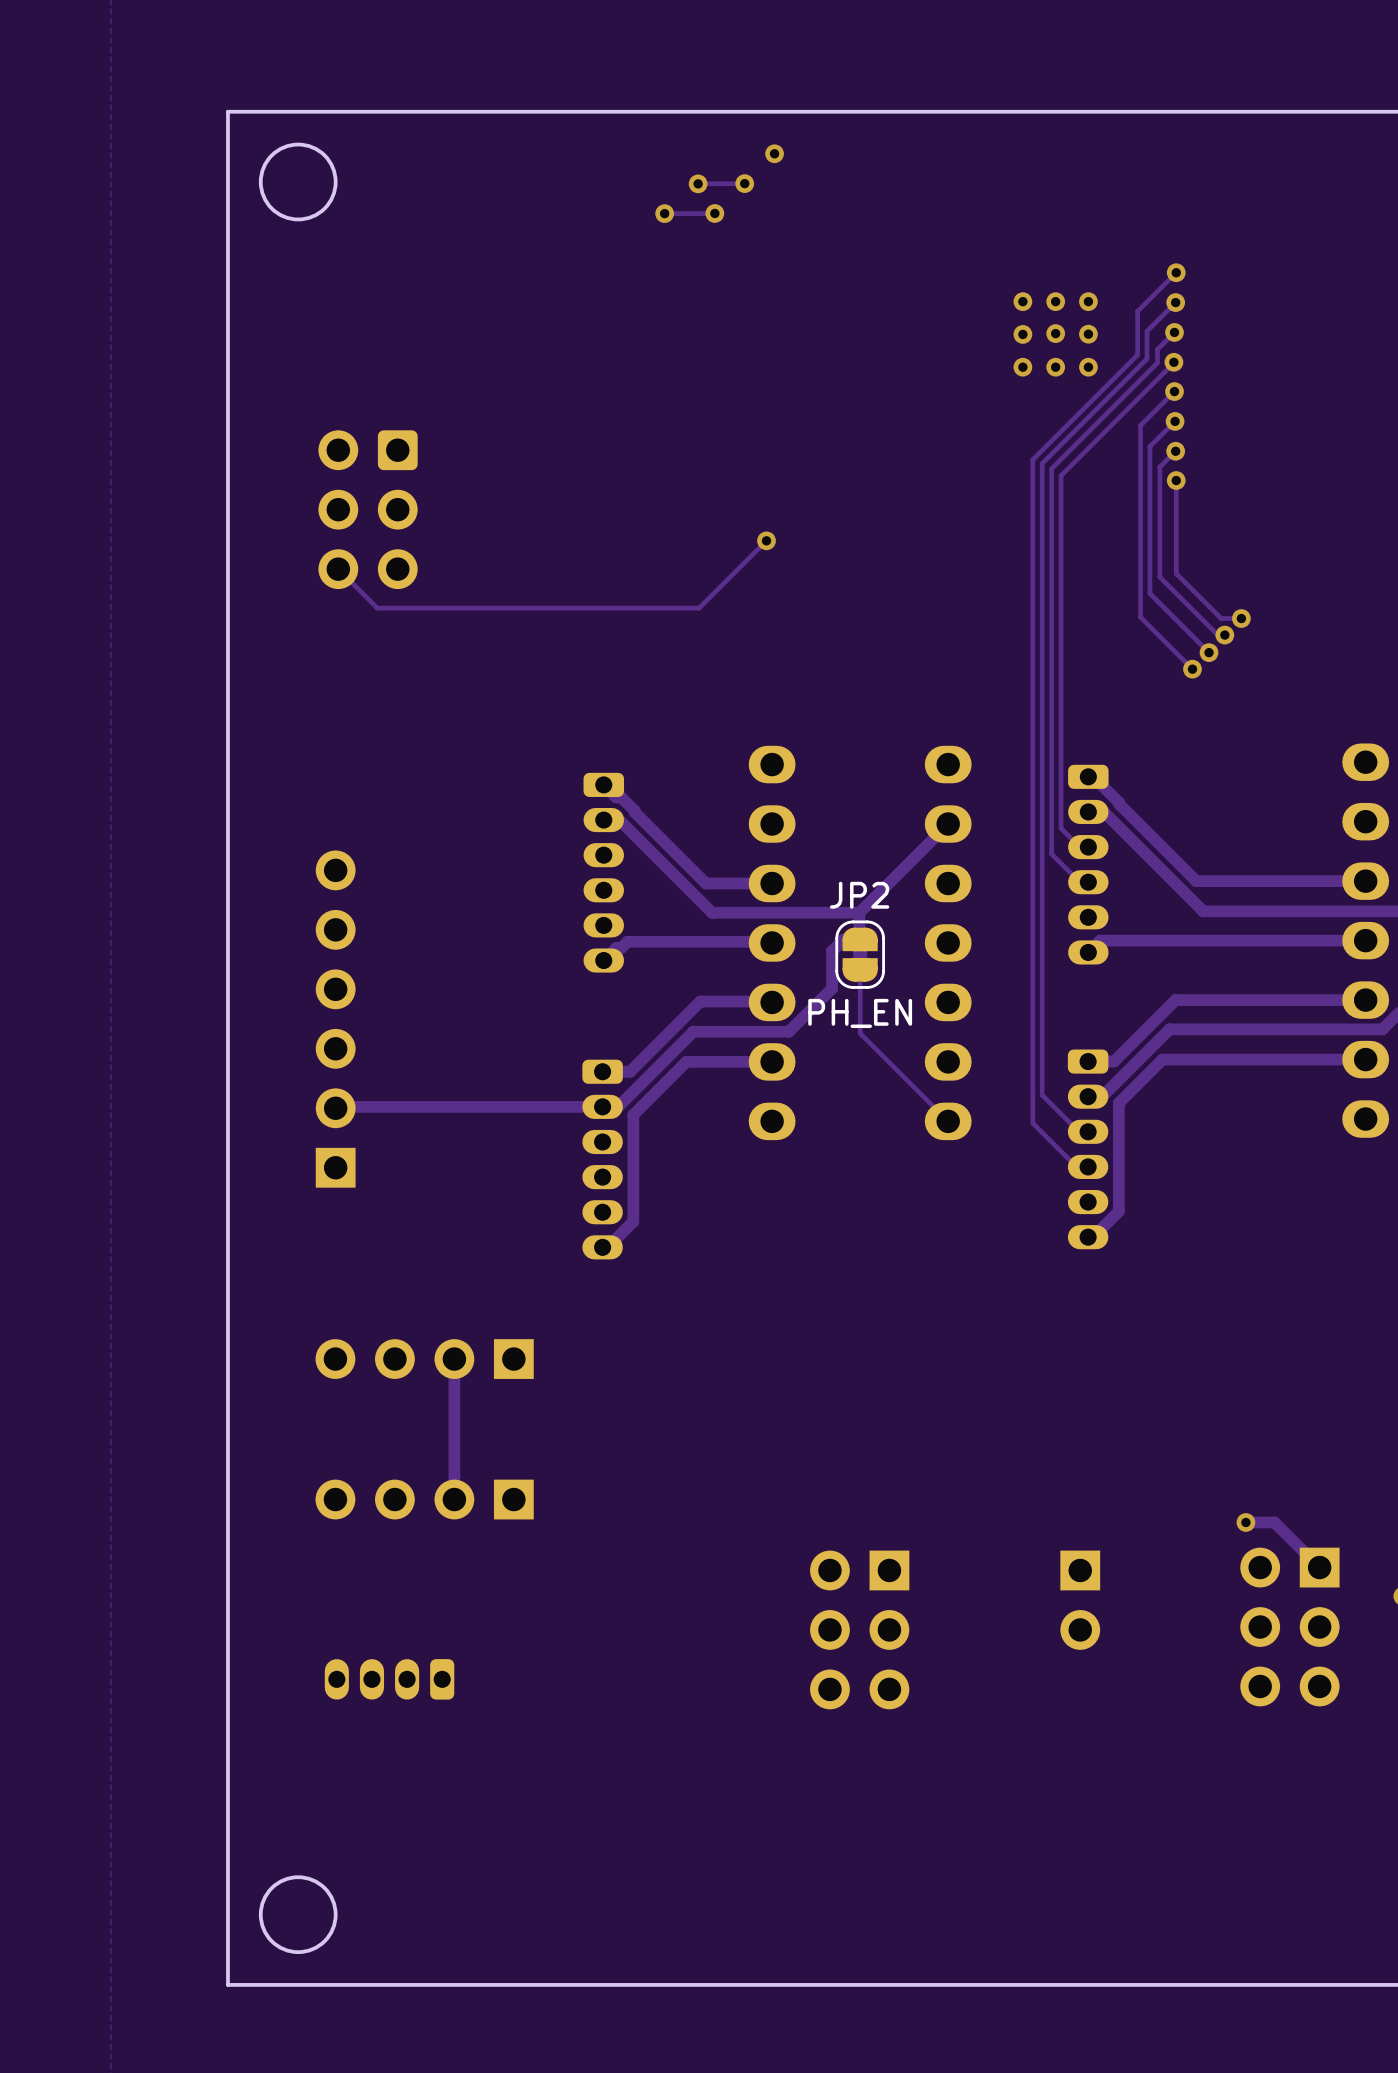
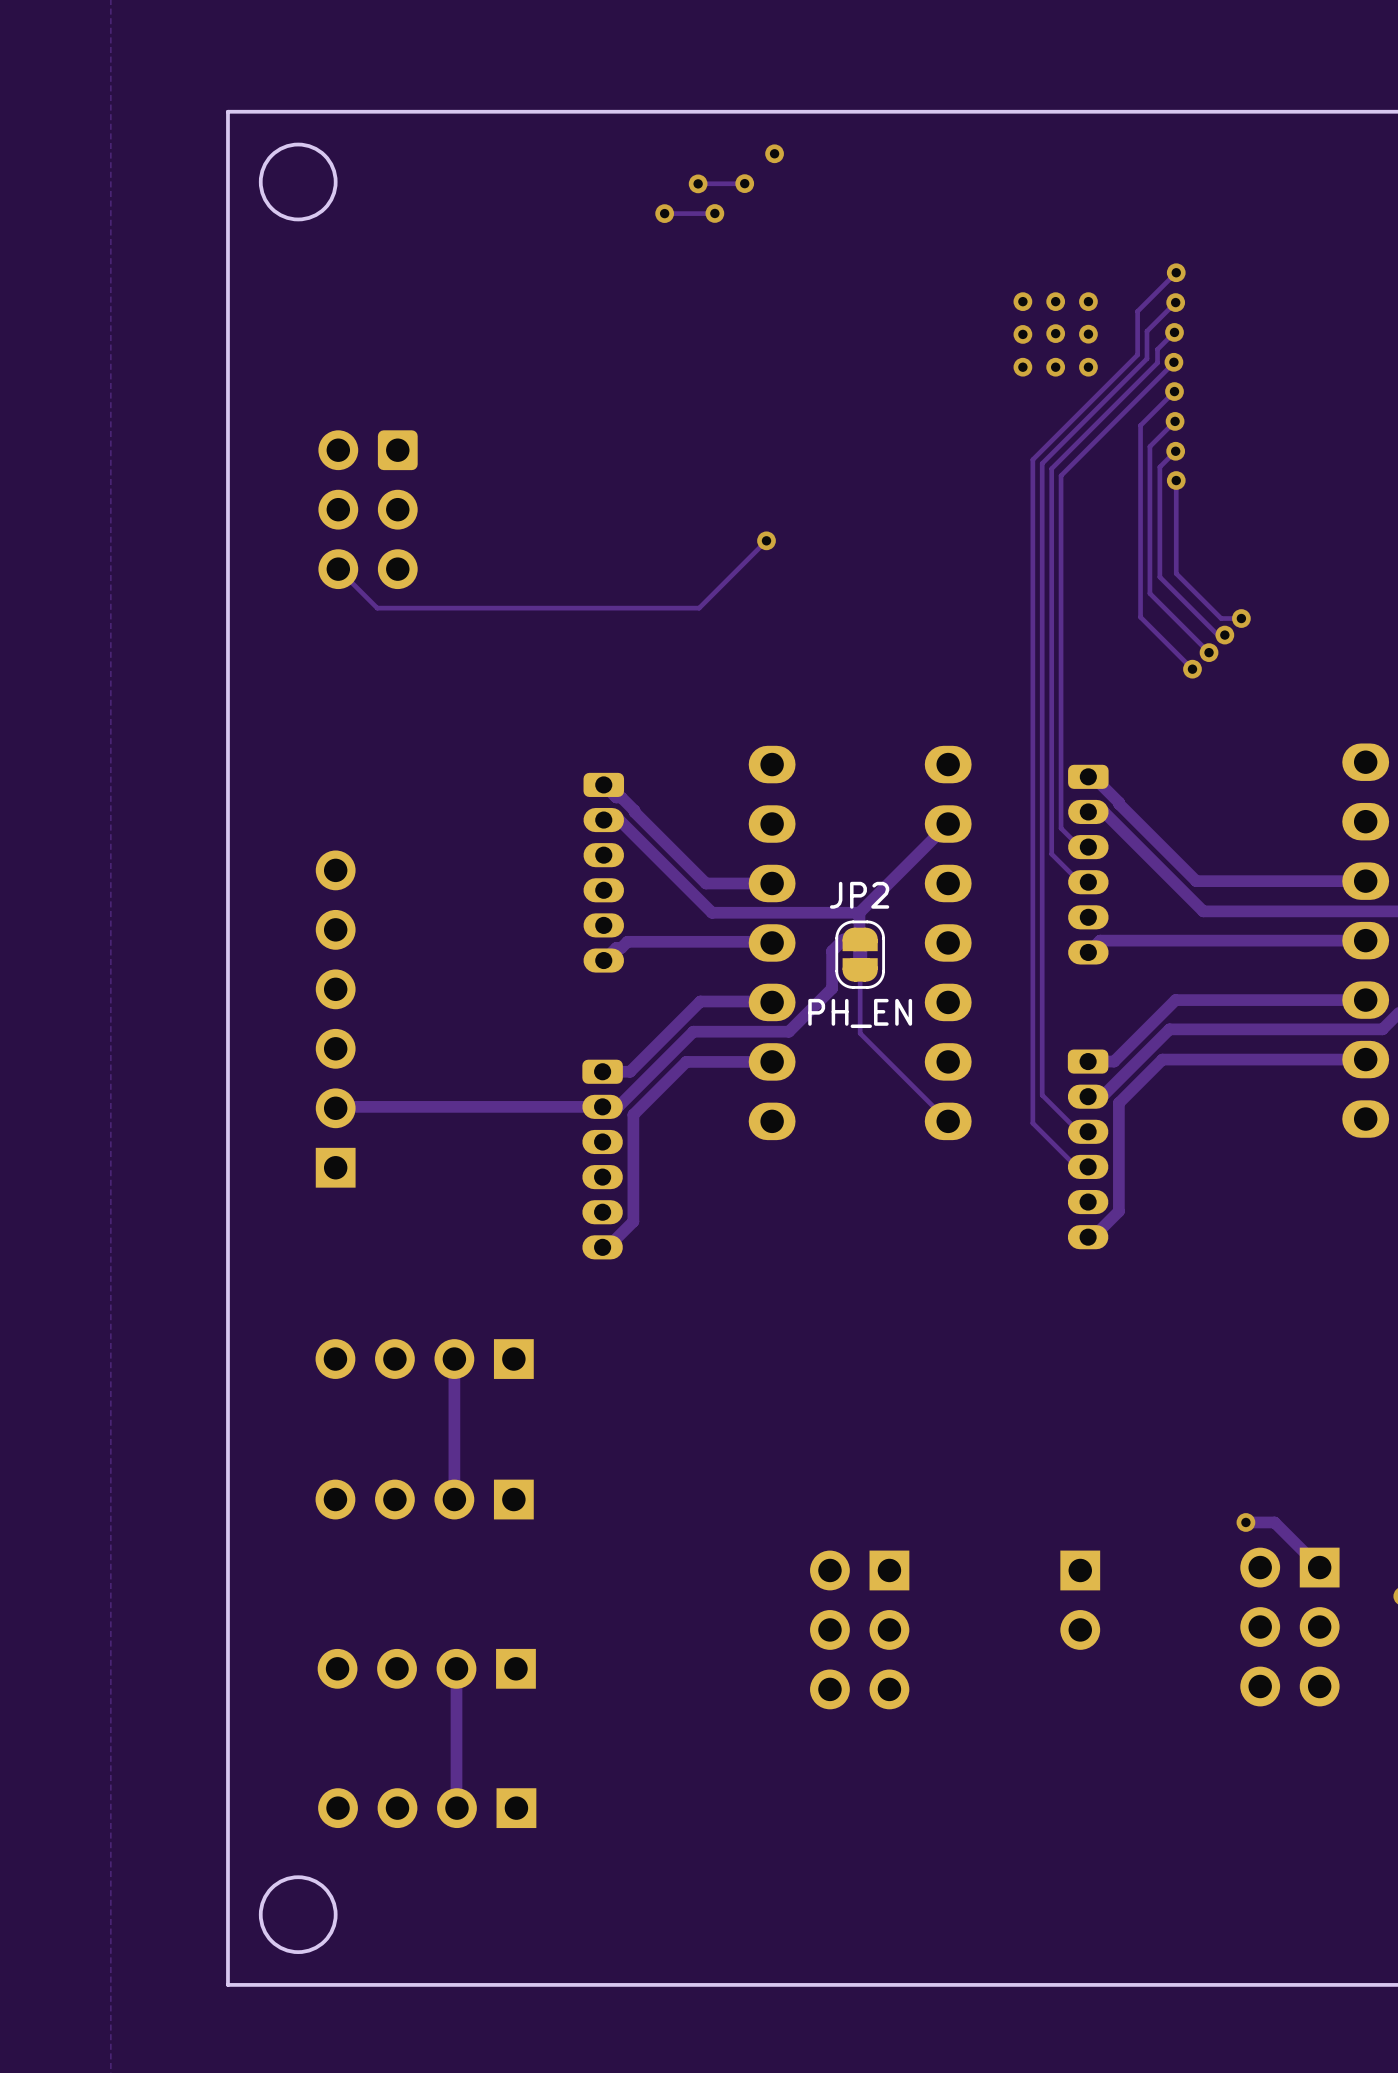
part: none -> (426, 1668)
track: none -> (456, 1668) (456, 1808)
part: (389, 1679) -> none
part: none -> (427, 1808)

